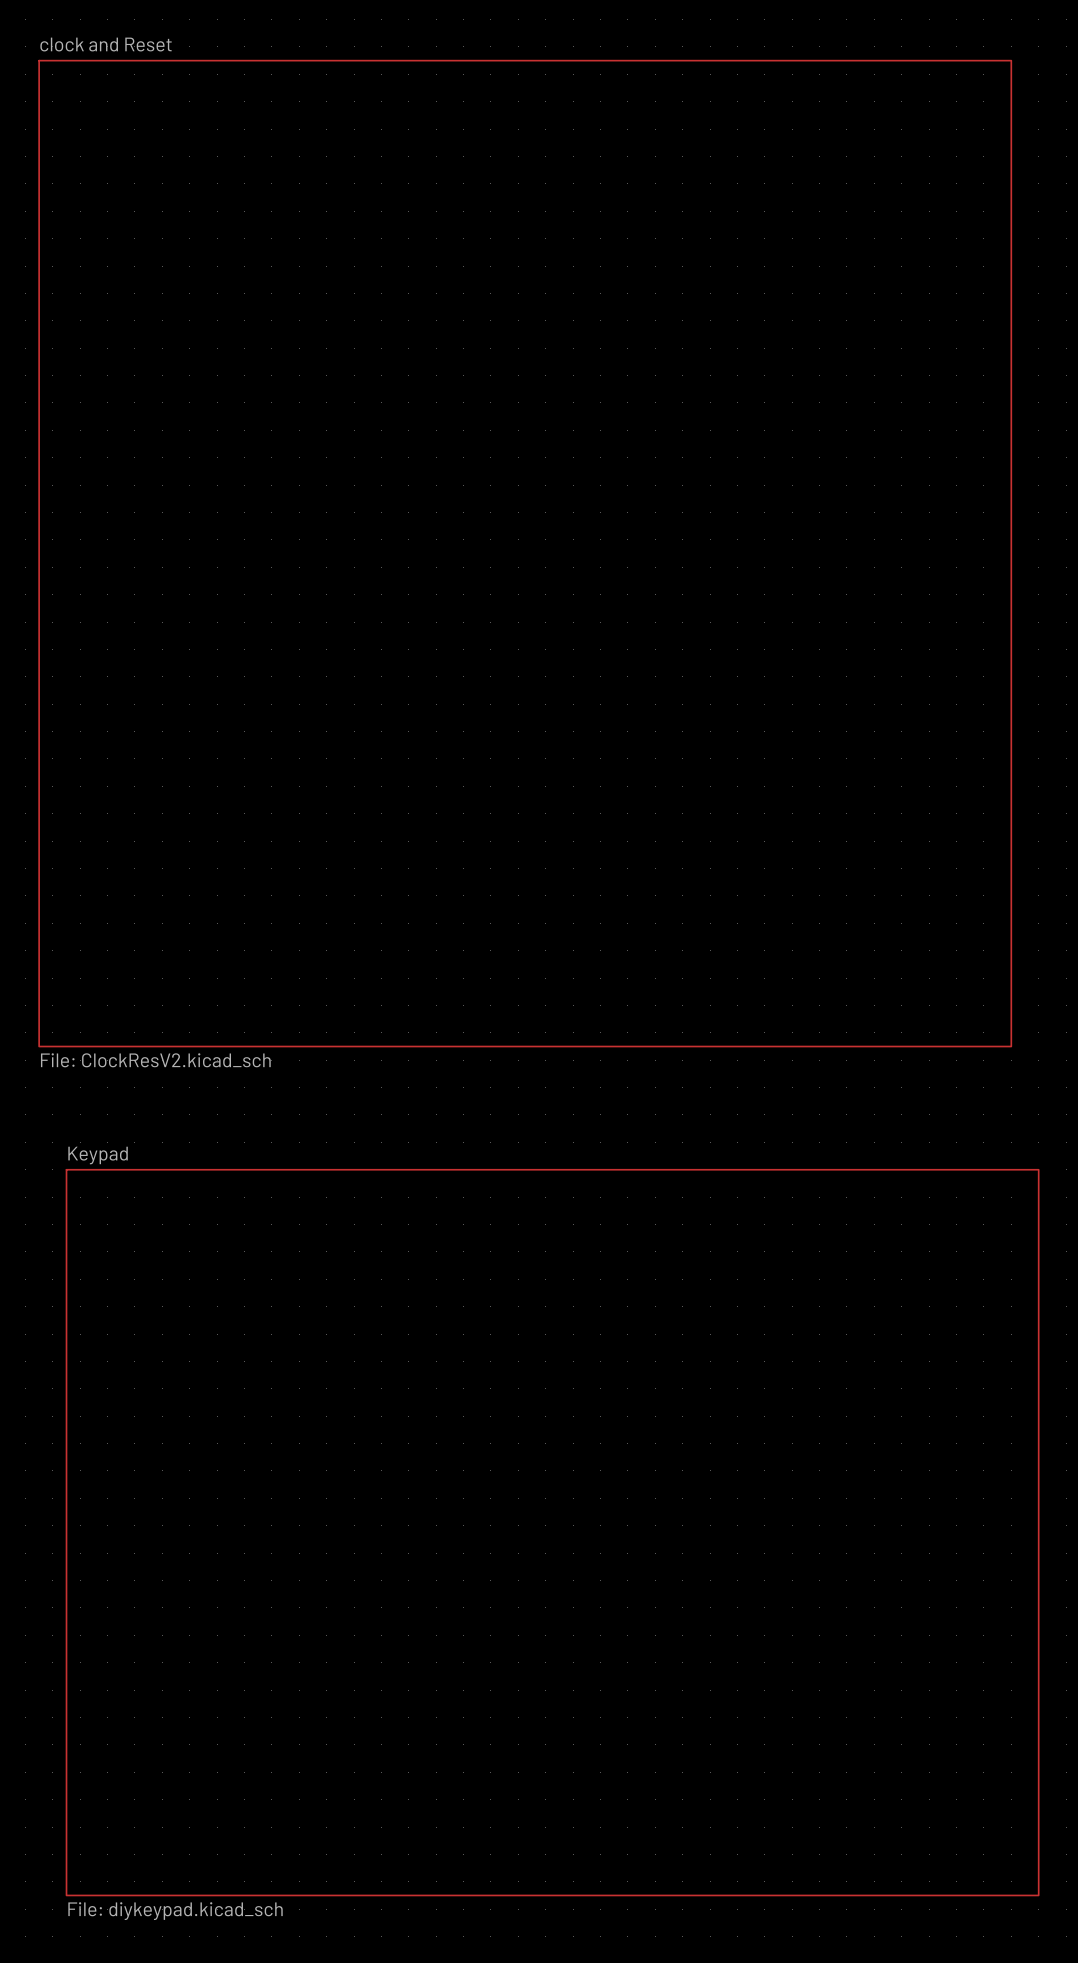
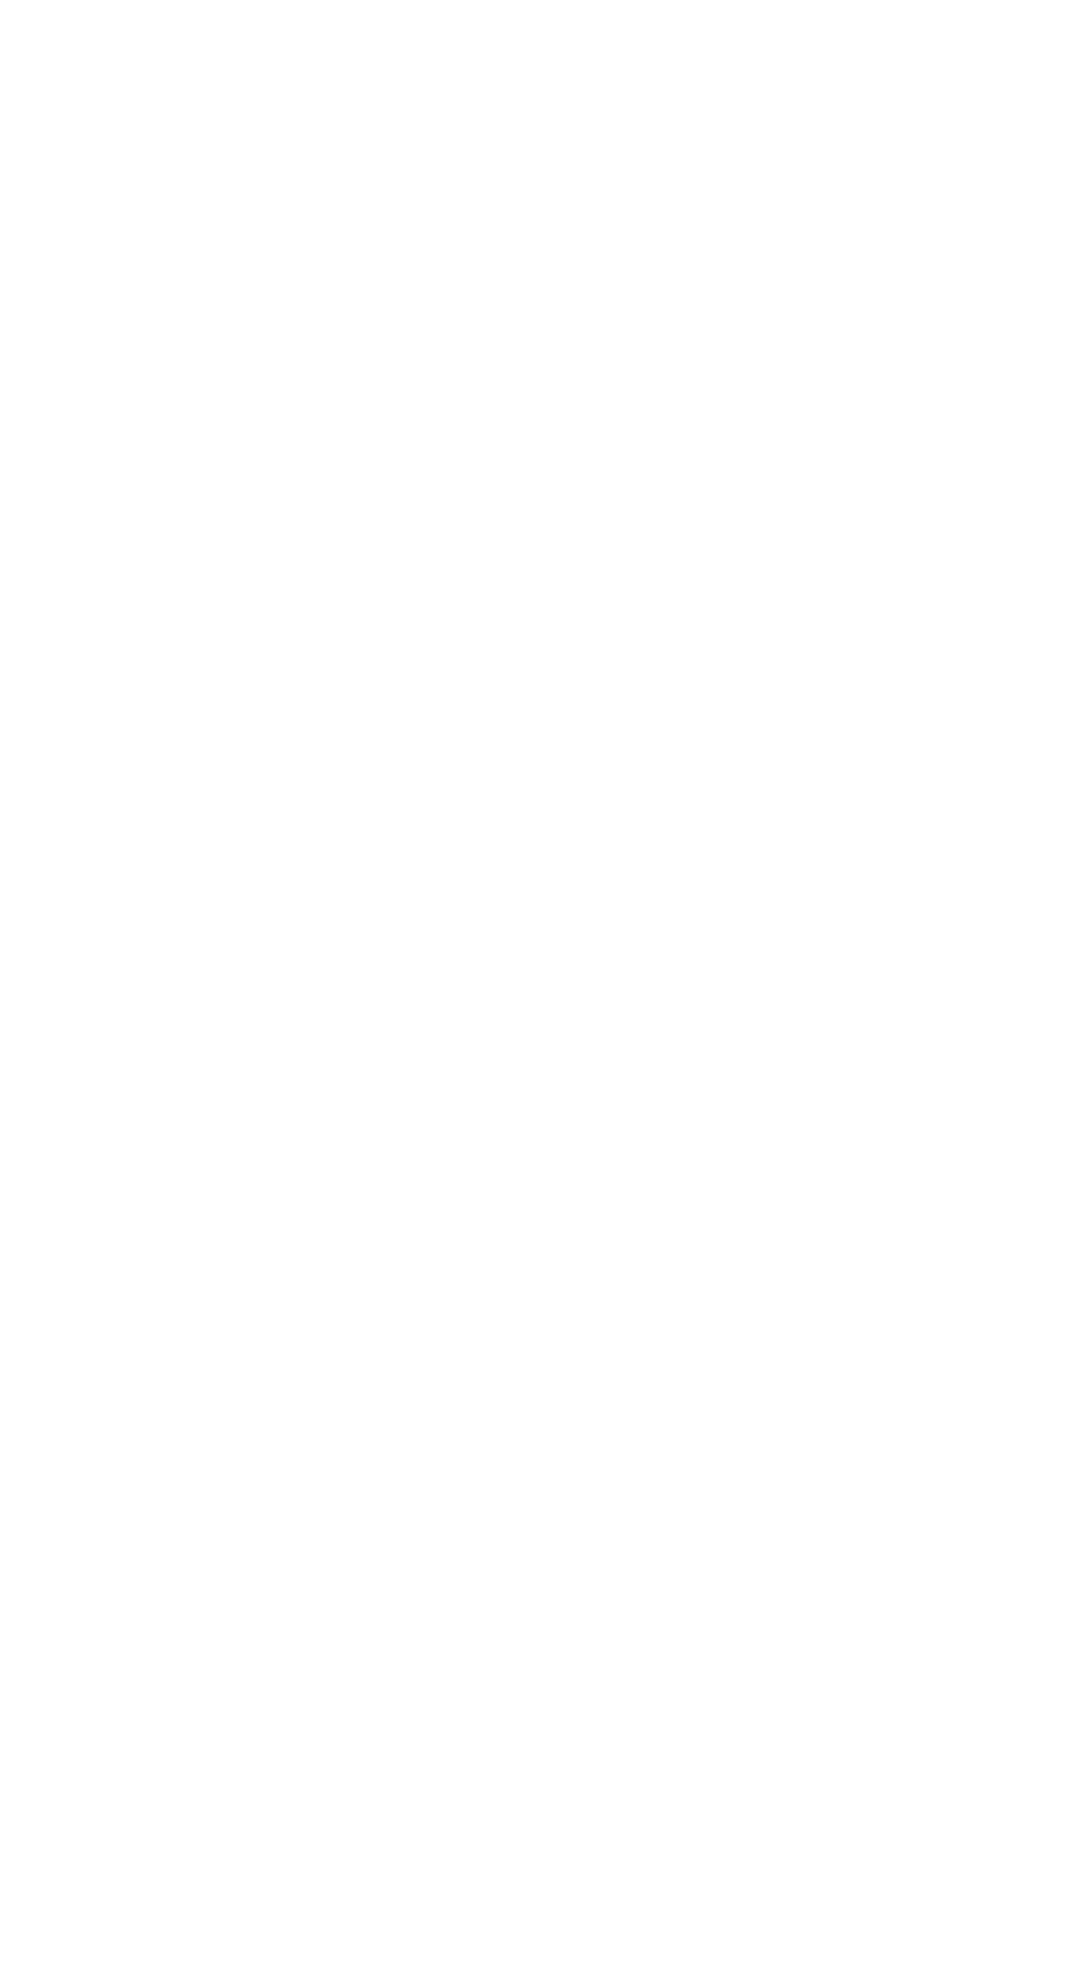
sheet clock and Reset: File: ClockResV2.kicad_sch (525, 553) -> none
sheet Keypad: File: diykeypad.kicad_sch (552, 1532) -> none

